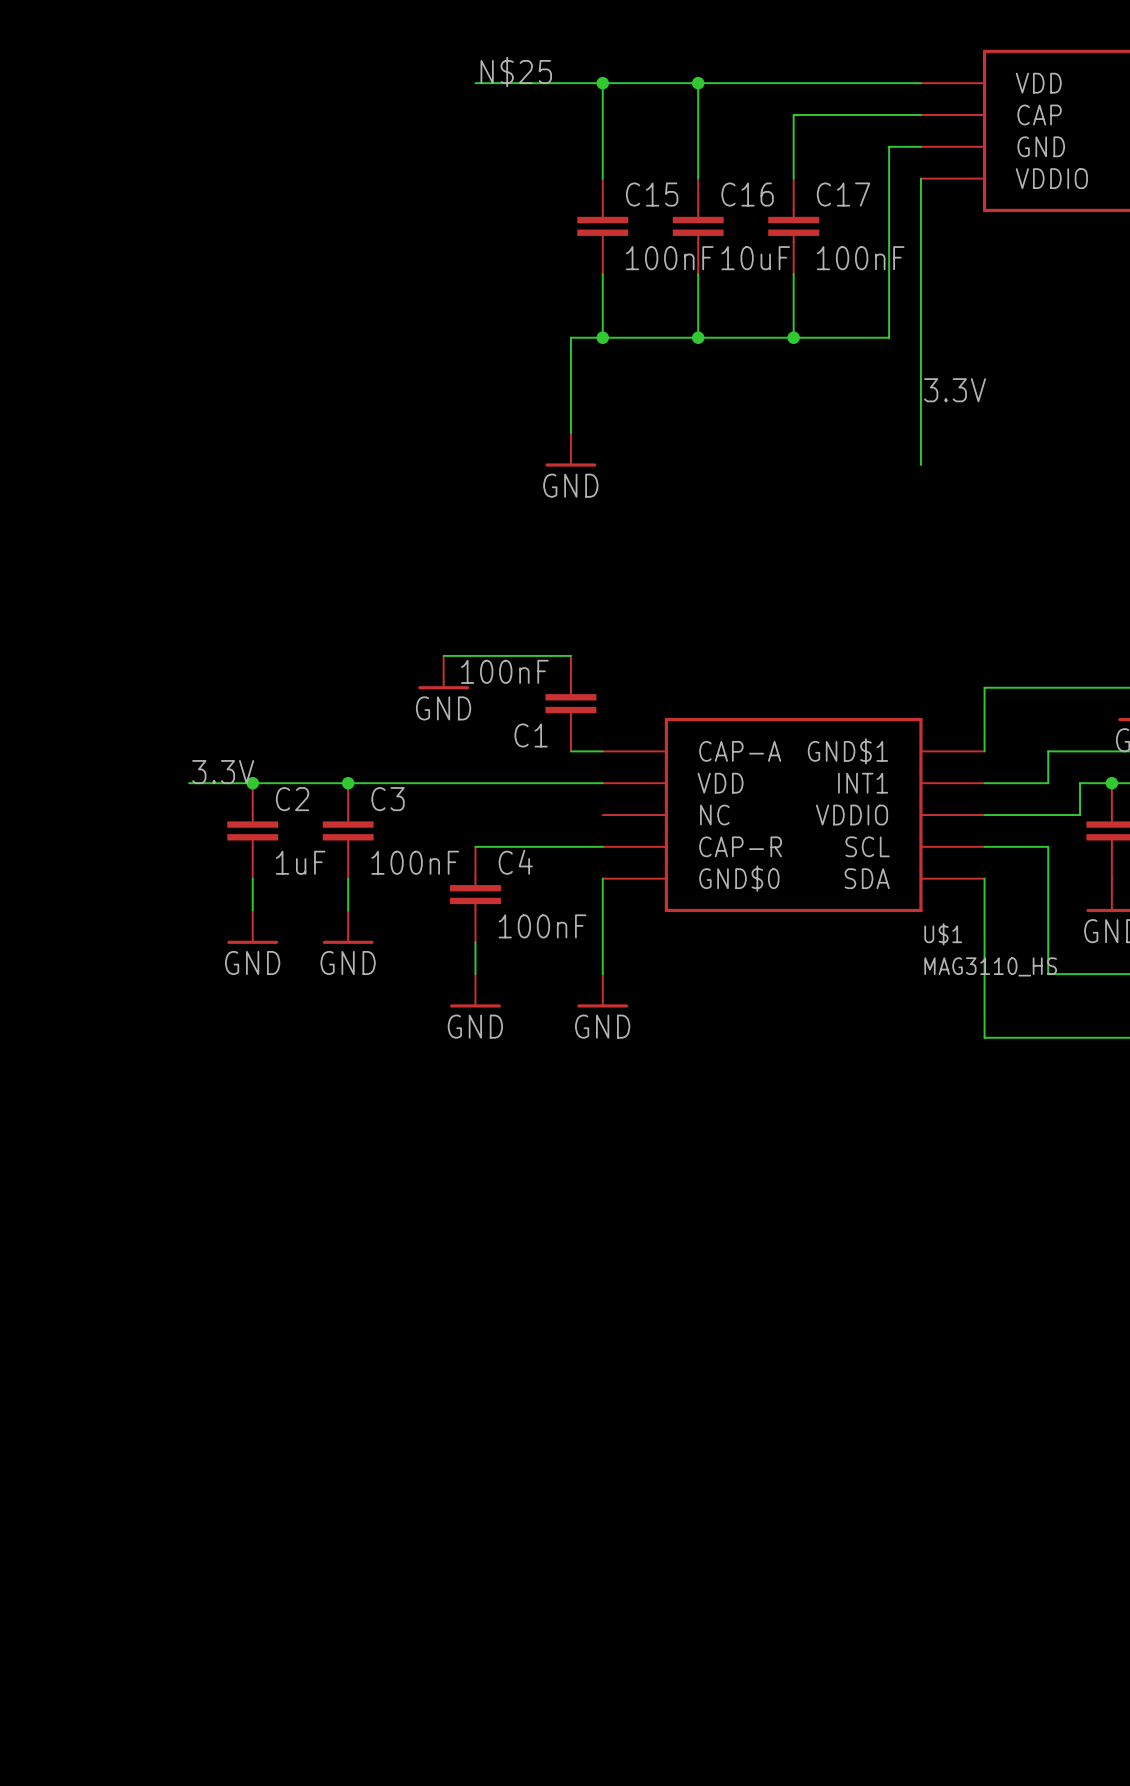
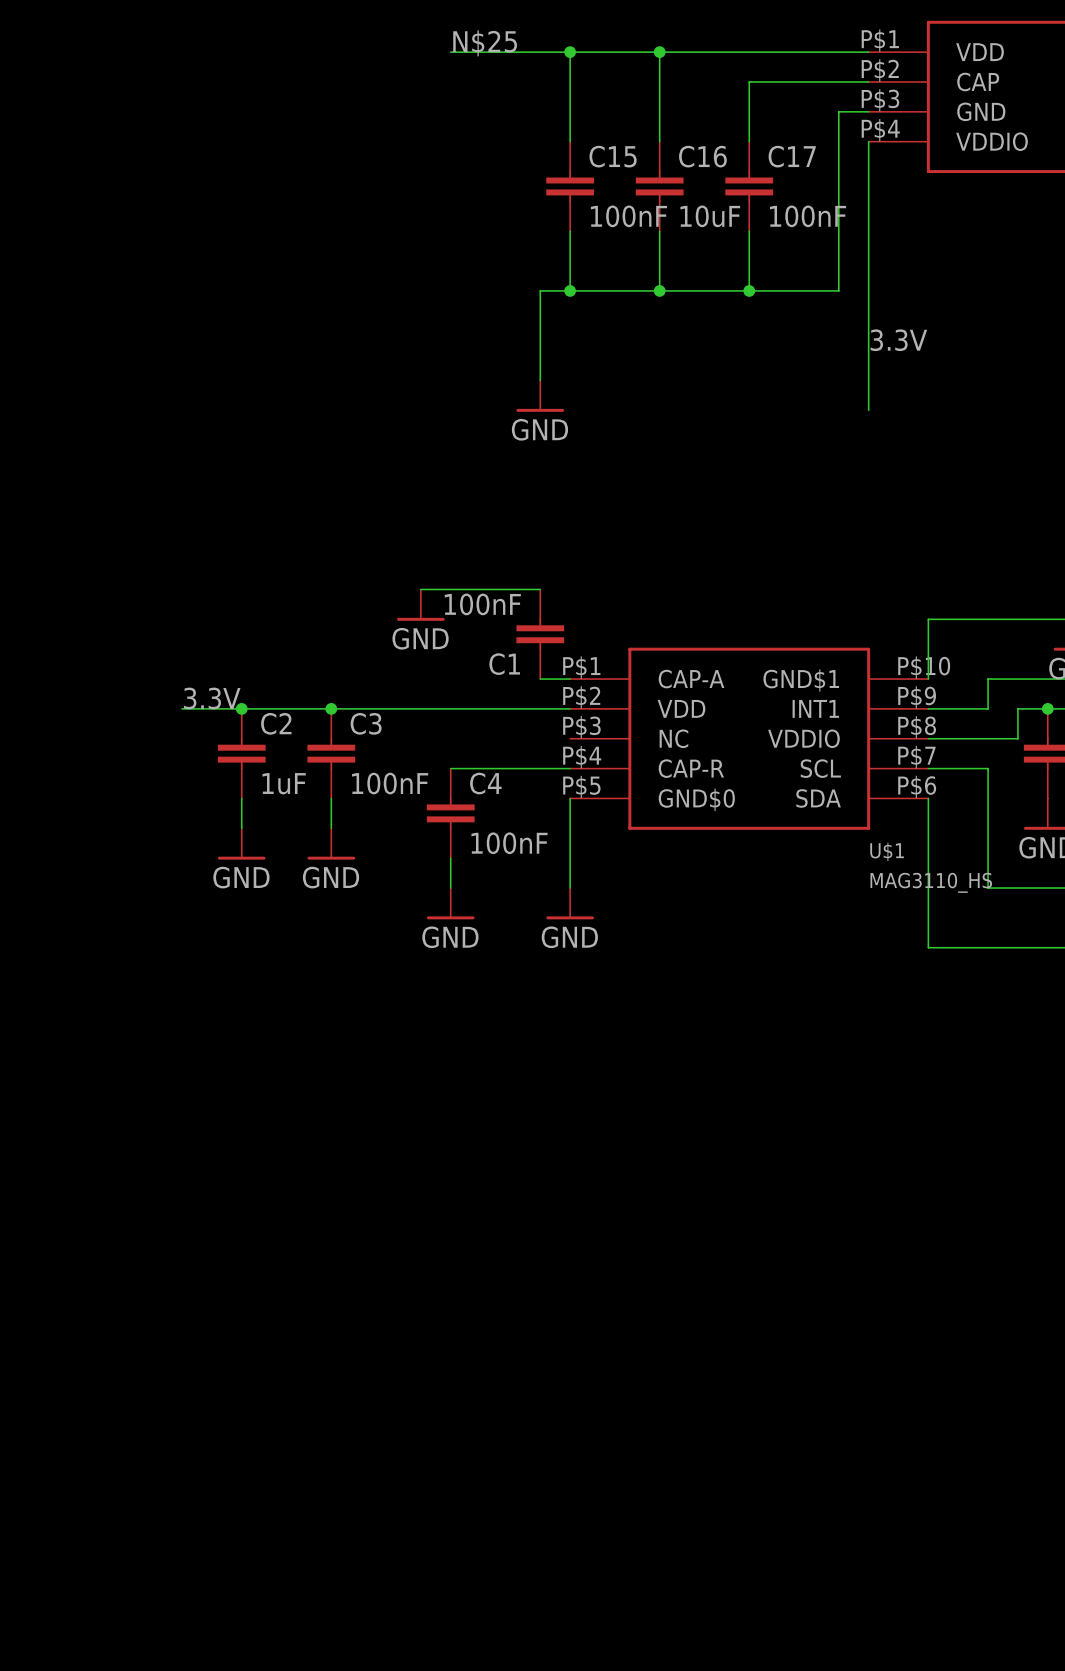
part pin number: none -> P$1 (880, 40)
part pin number: none -> P$2 (880, 70)
part pin number: none -> P$3 (880, 100)
part pin number: none -> P$4 (880, 130)
U$1 symbol: [602, 717, 985, 913] -> [570, 647, 929, 830]

